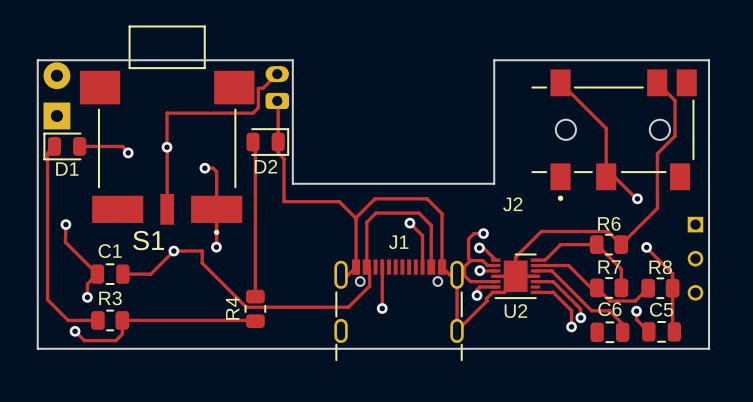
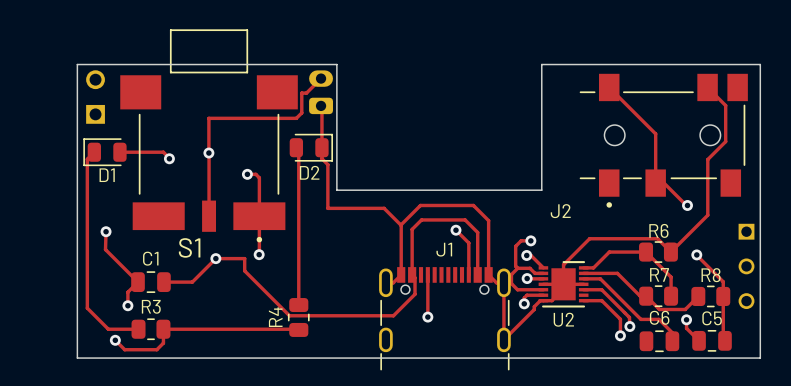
part footprint: [43, 62, 71, 90] -> [86, 70, 105, 90]
part footprint: [43, 102, 71, 130] -> [86, 104, 105, 124]

